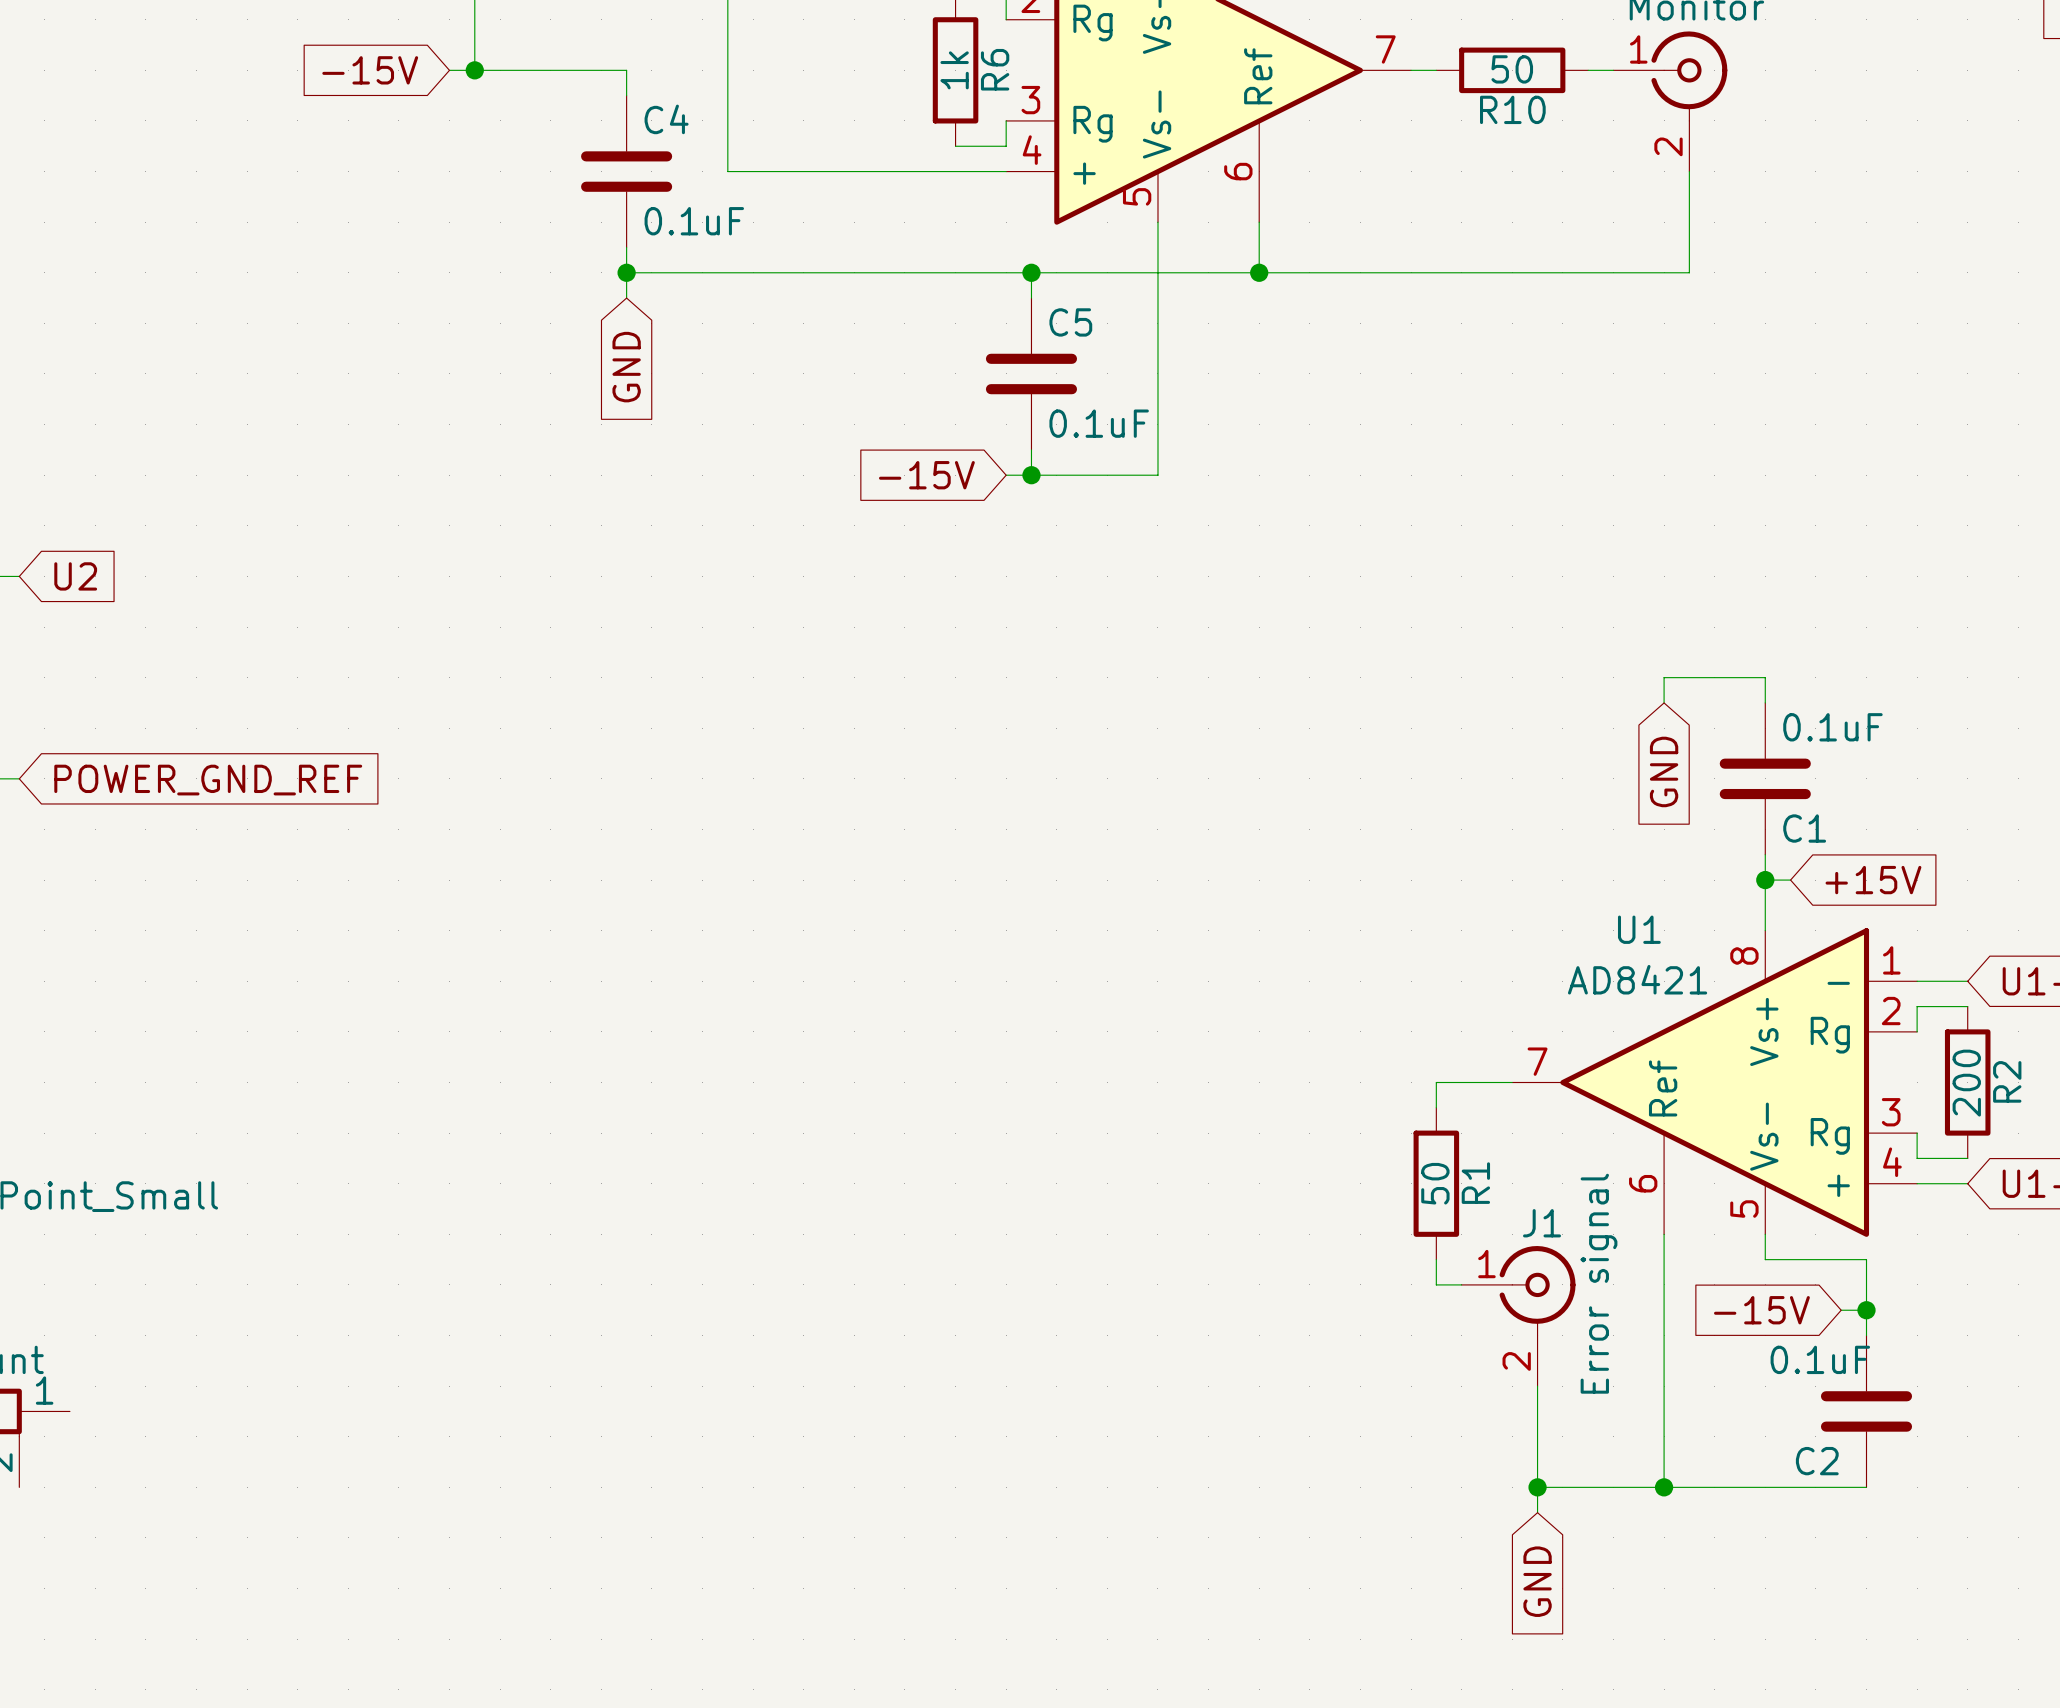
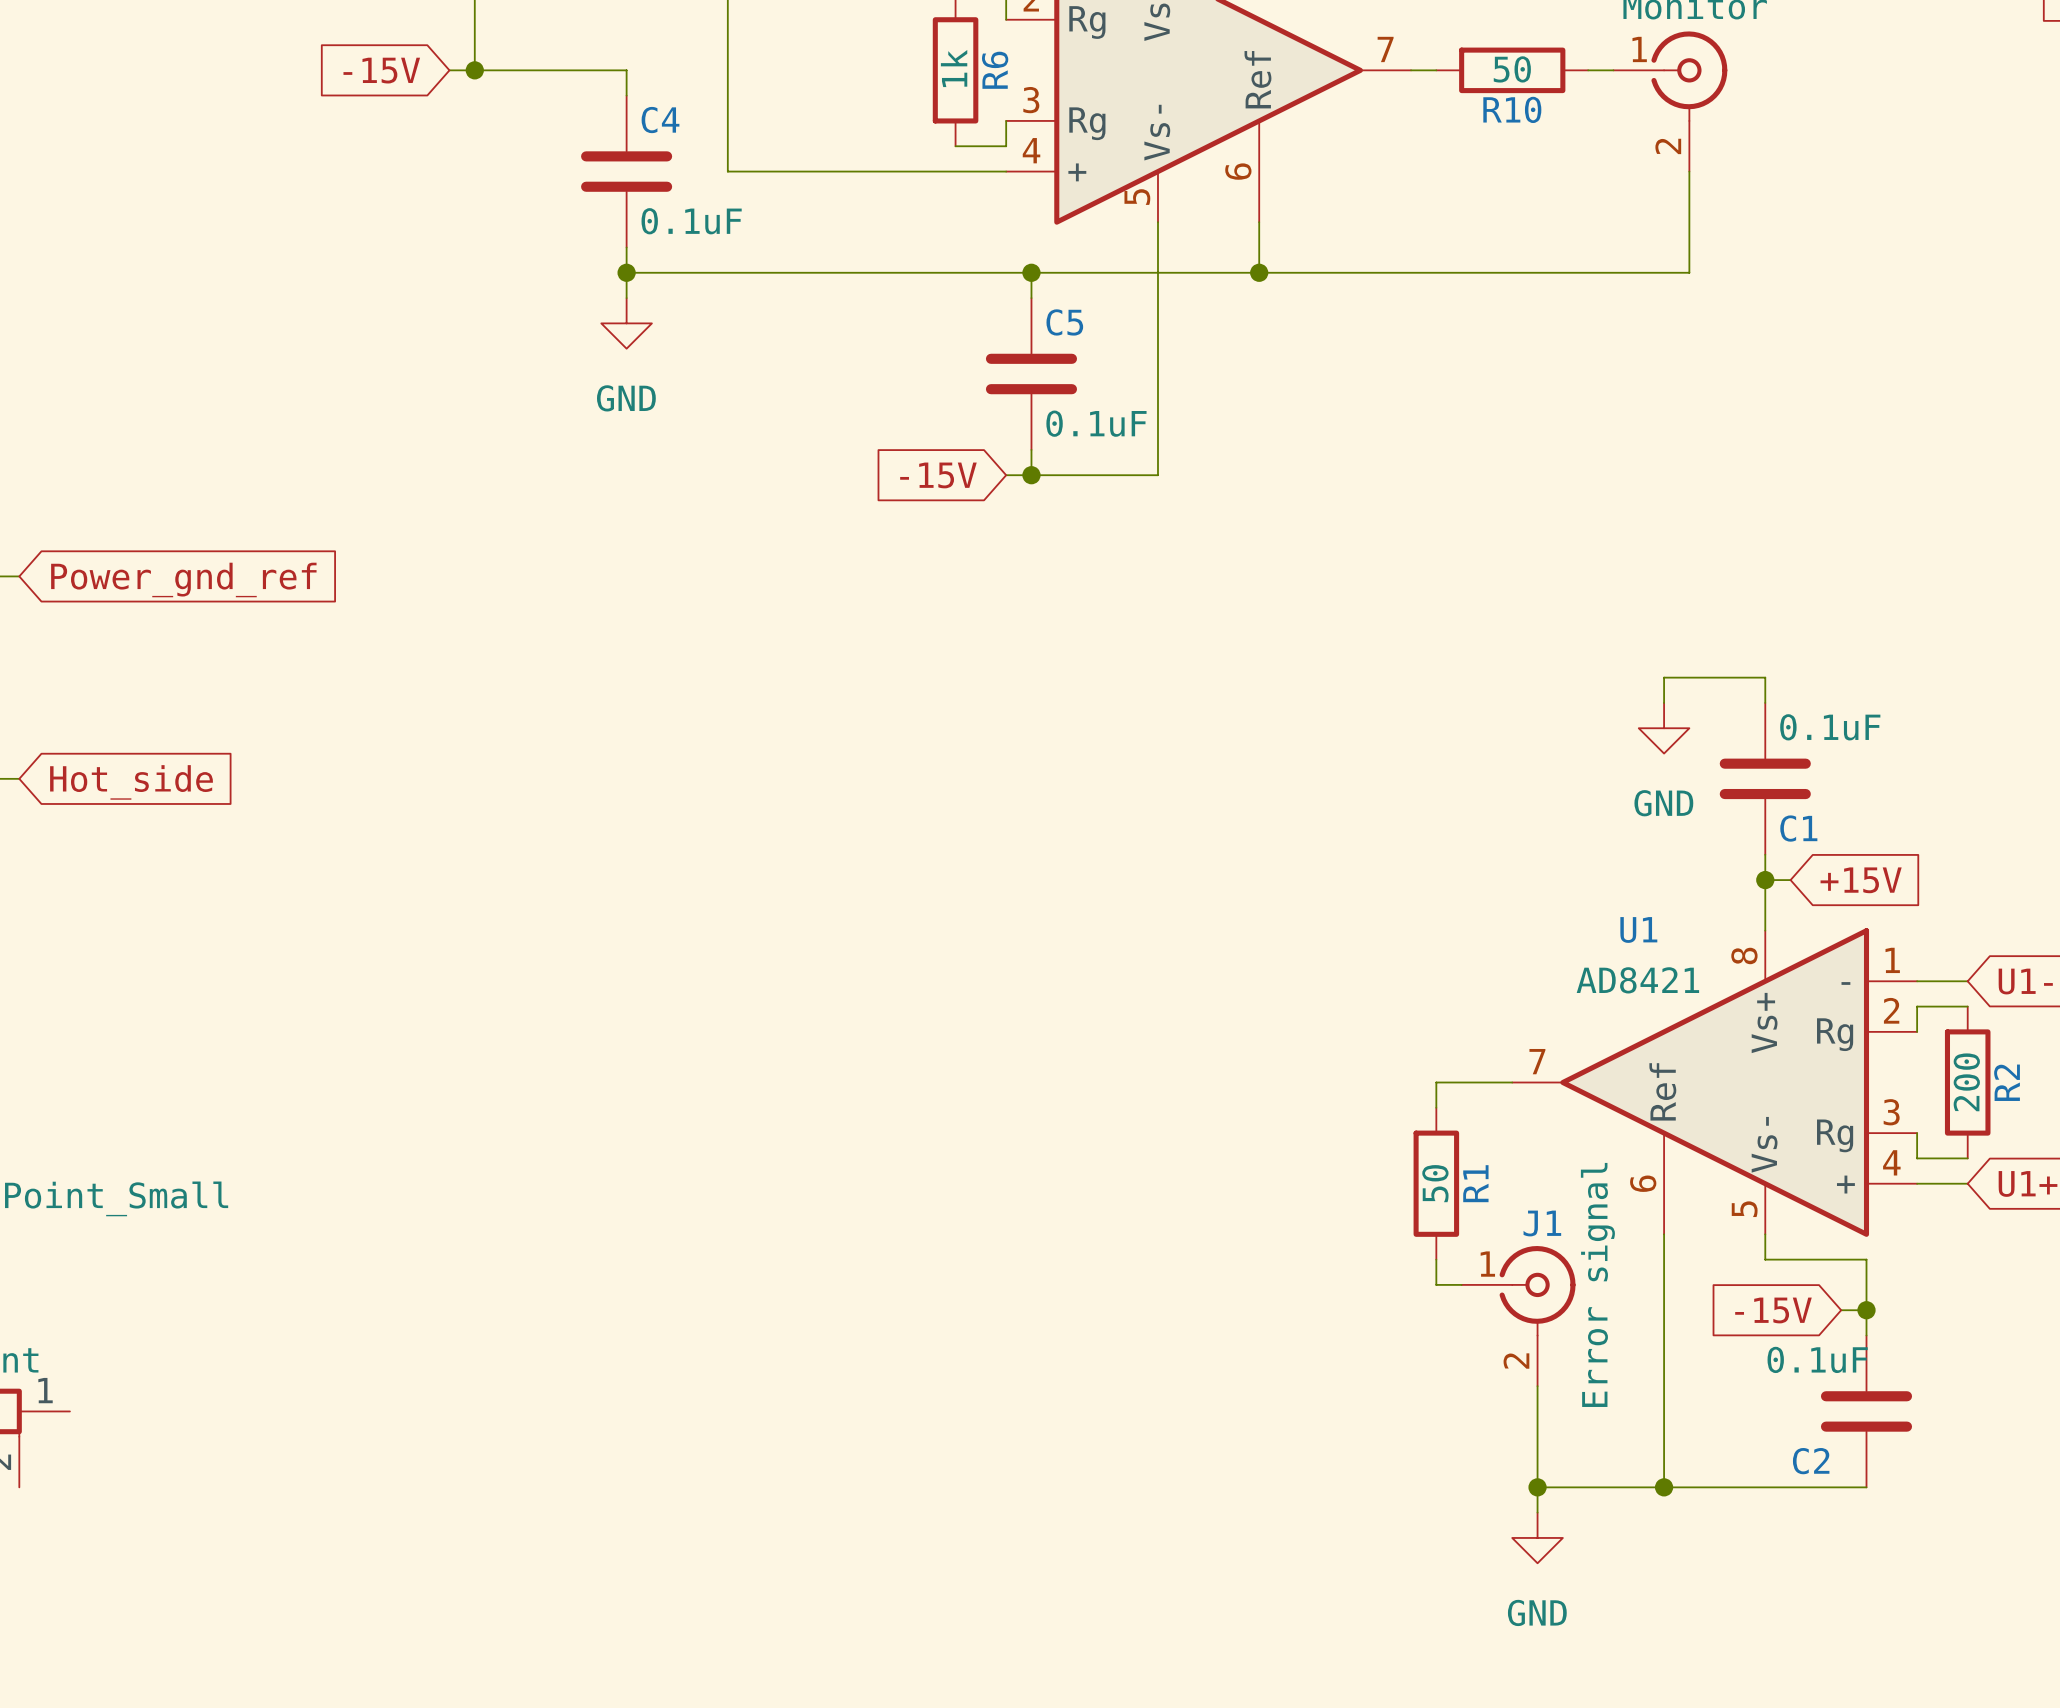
power symbol: none -> GND (626, 323)
global label: GND (626, 367) -> none
global label: U2 (75, 576) -> Power_gnd_ref (183, 579)
power symbol: none -> GND (1664, 728)
global label: GND (1664, 771) -> none
global label: POWER_GND_REF (208, 780) -> Hot_side (131, 782)
power symbol: none -> GND (1537, 1537)
global label: GND (1537, 1581) -> none

